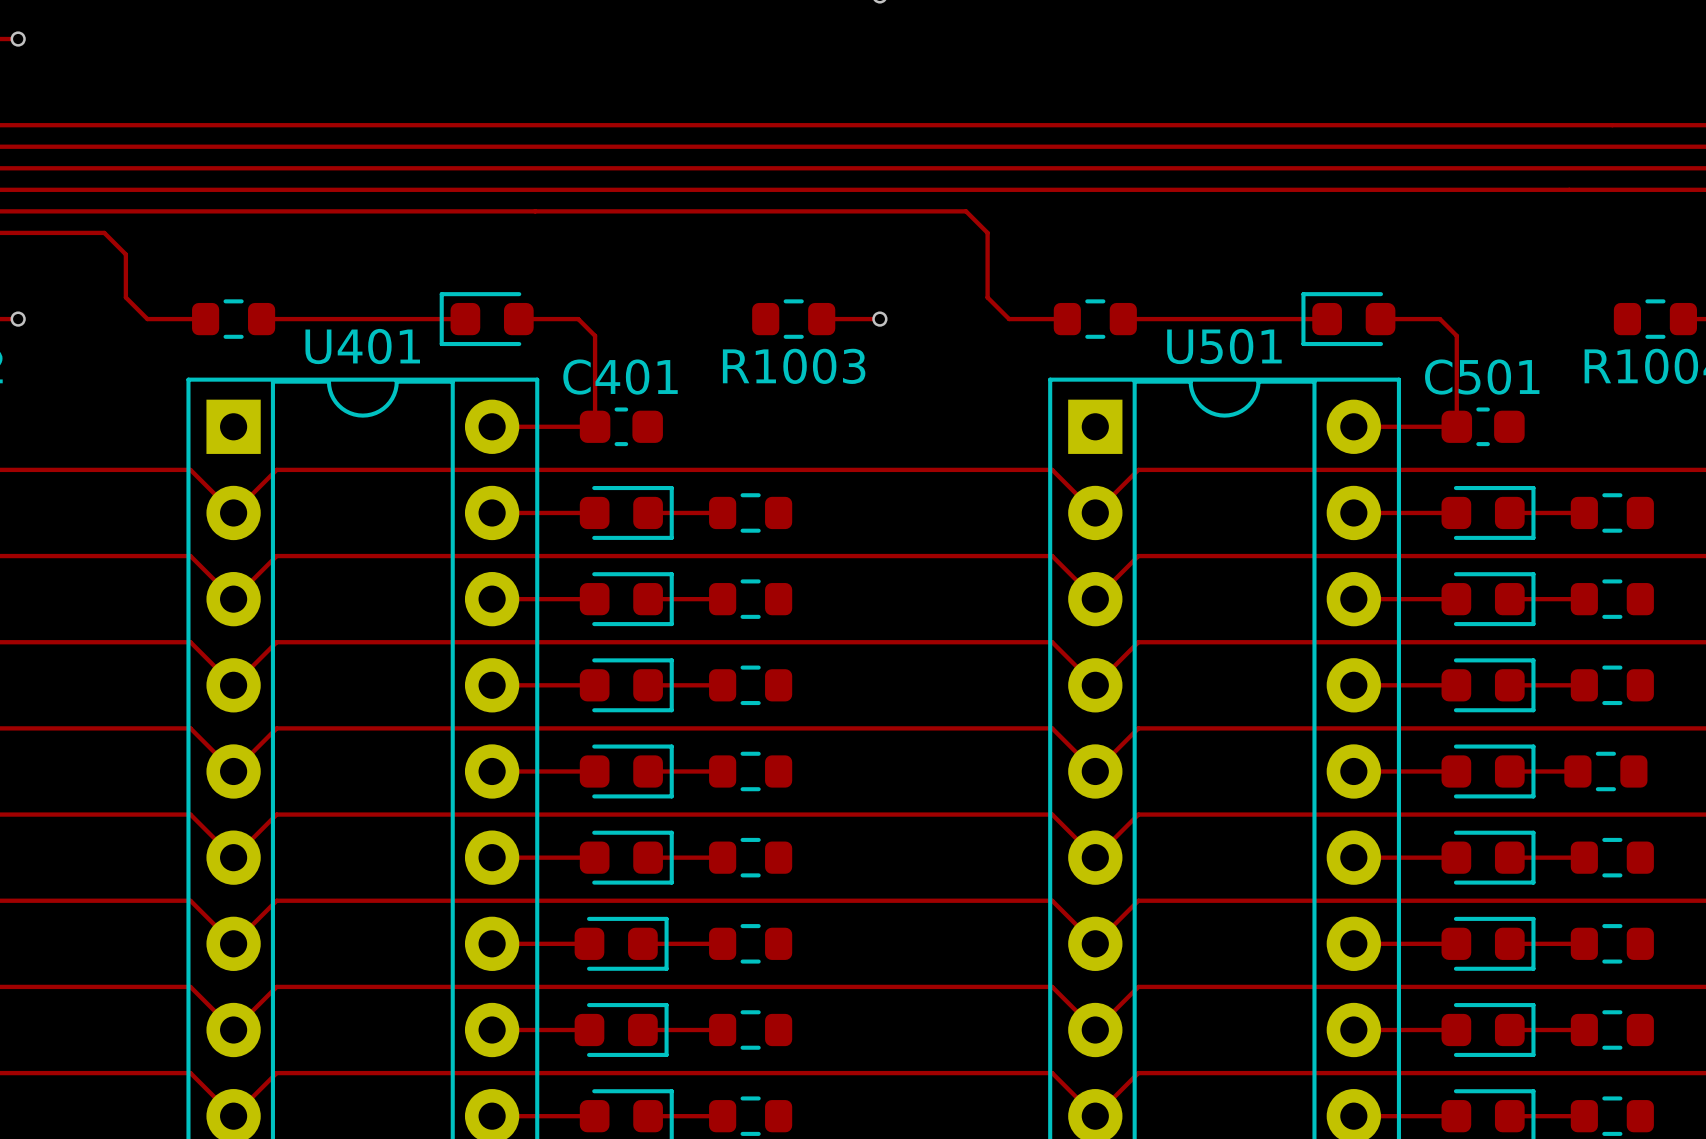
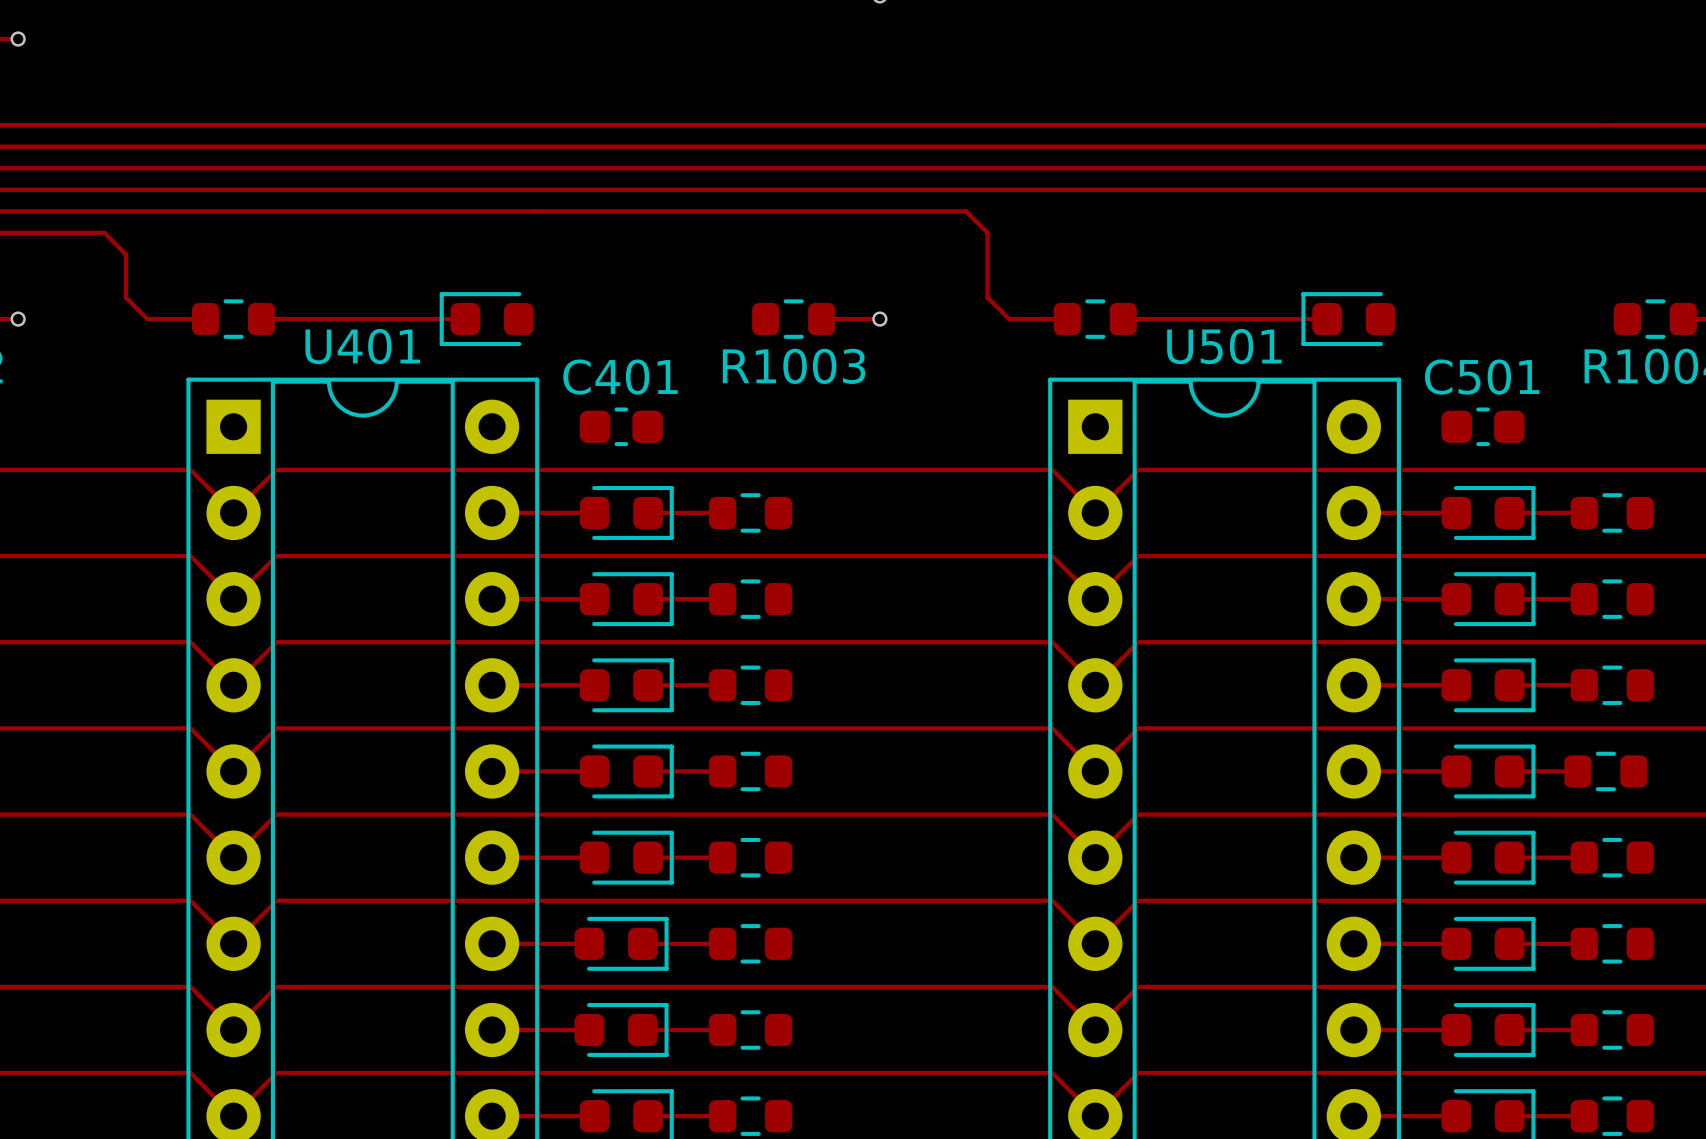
track: (518, 319) (578, 319) (595, 335) (595, 426) (492, 426) -> none
track: (1380, 319) (1440, 319) (1456, 335) (1456, 426) (1353, 426) -> none

